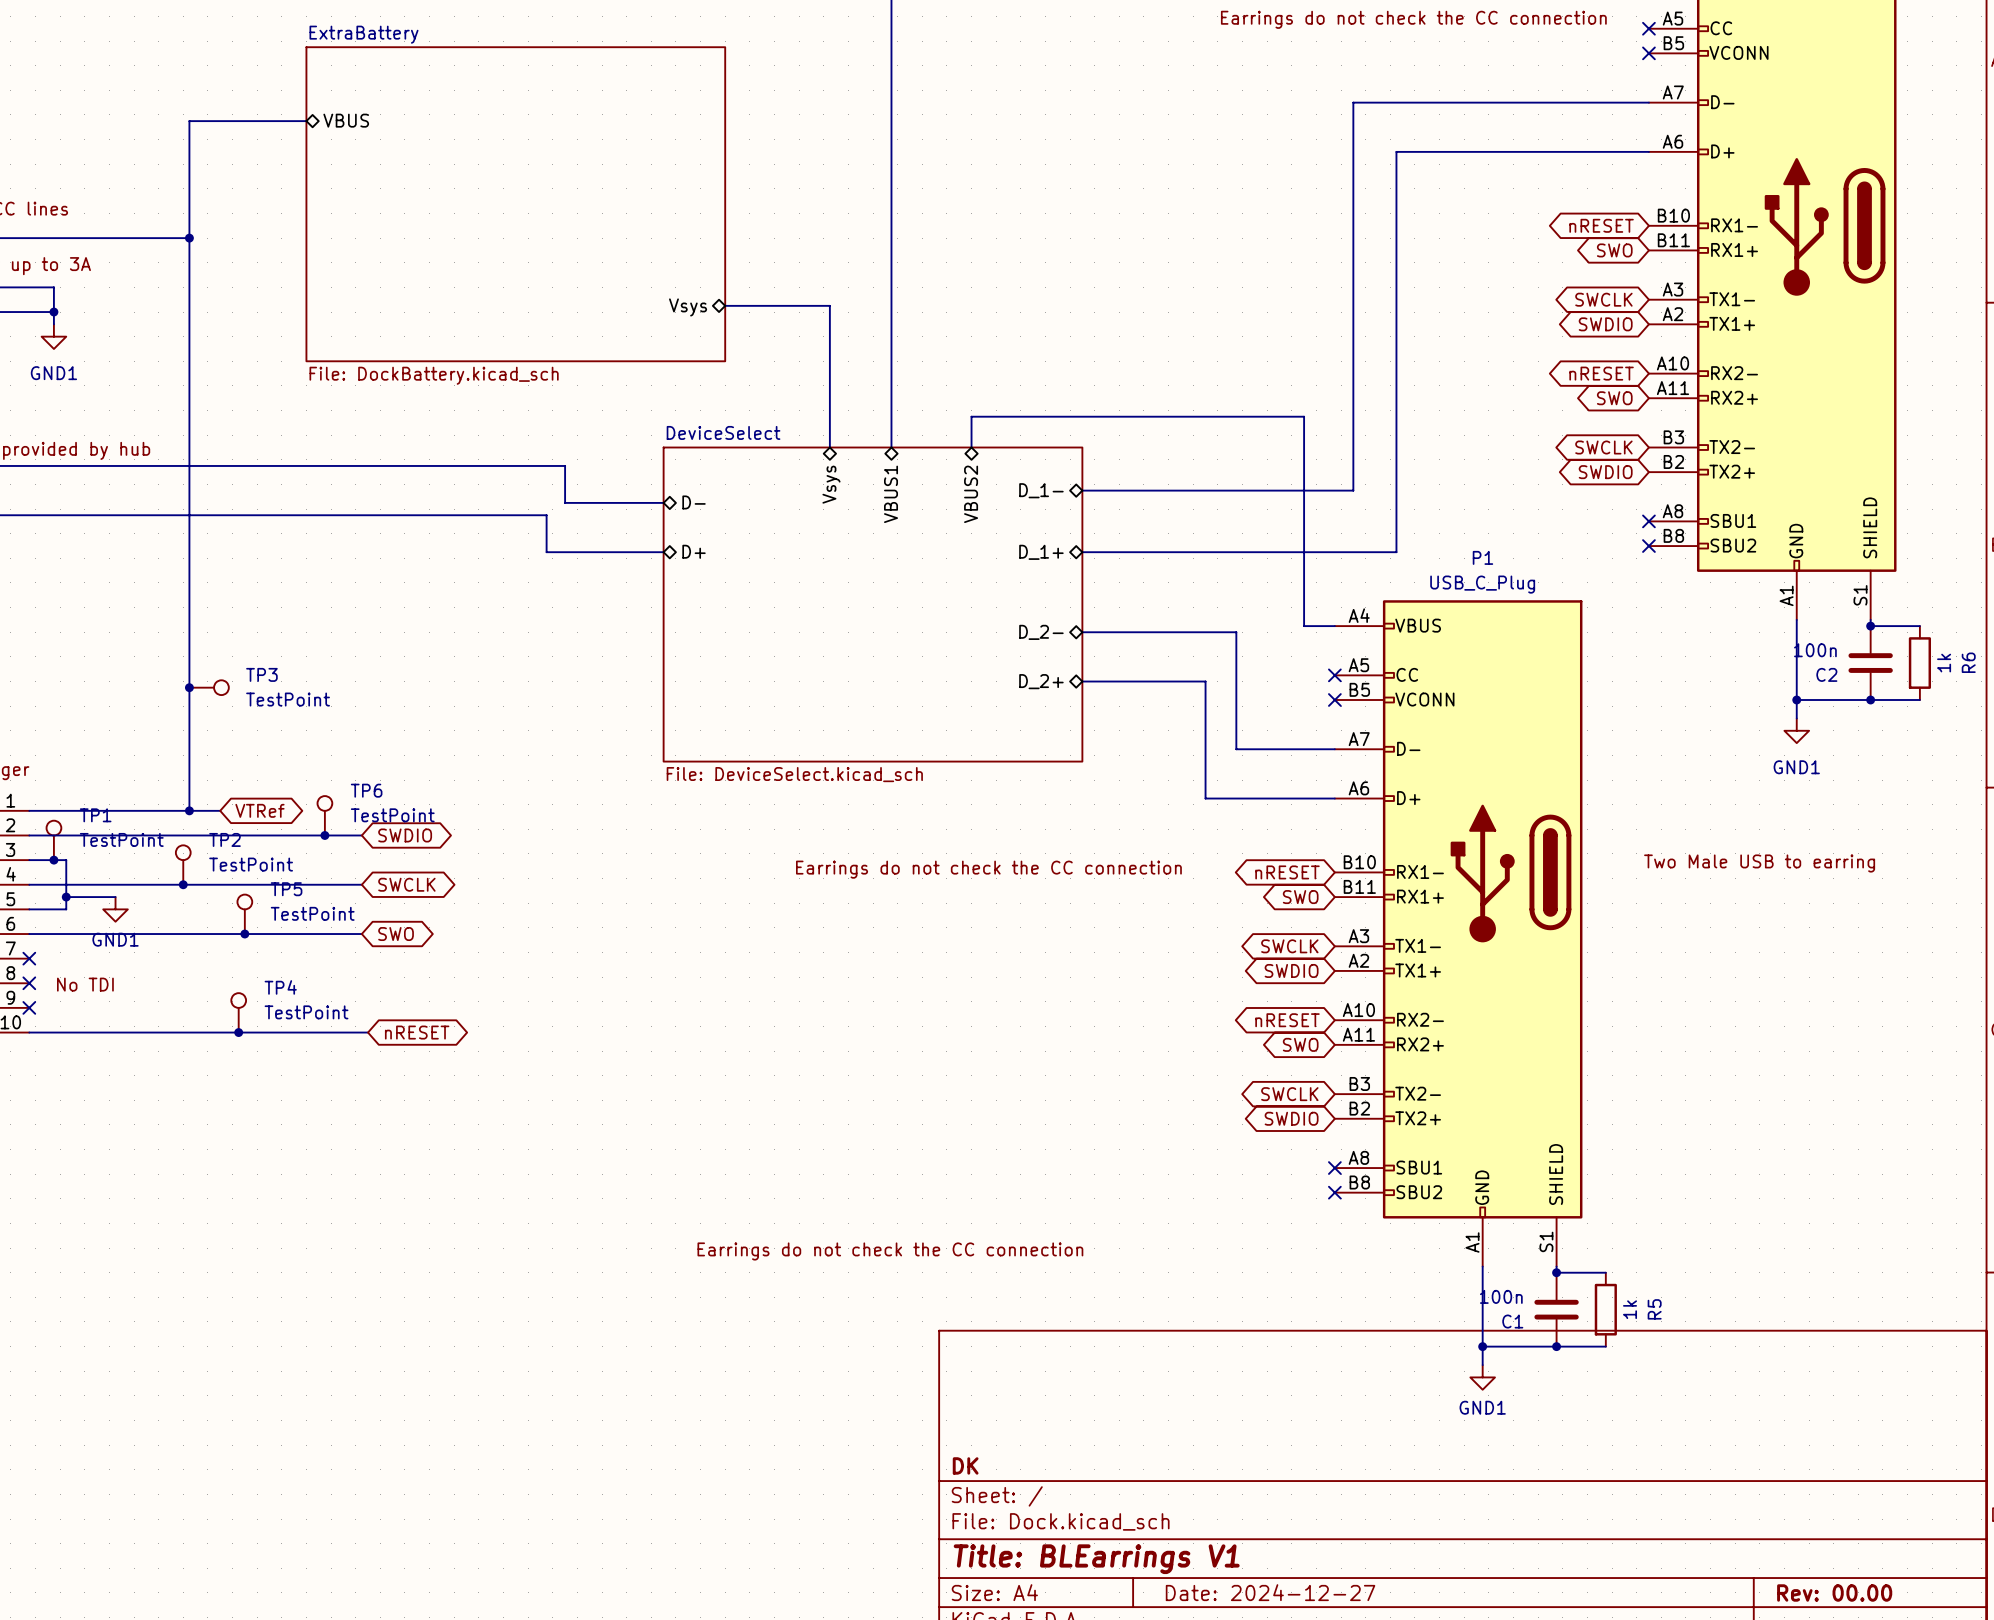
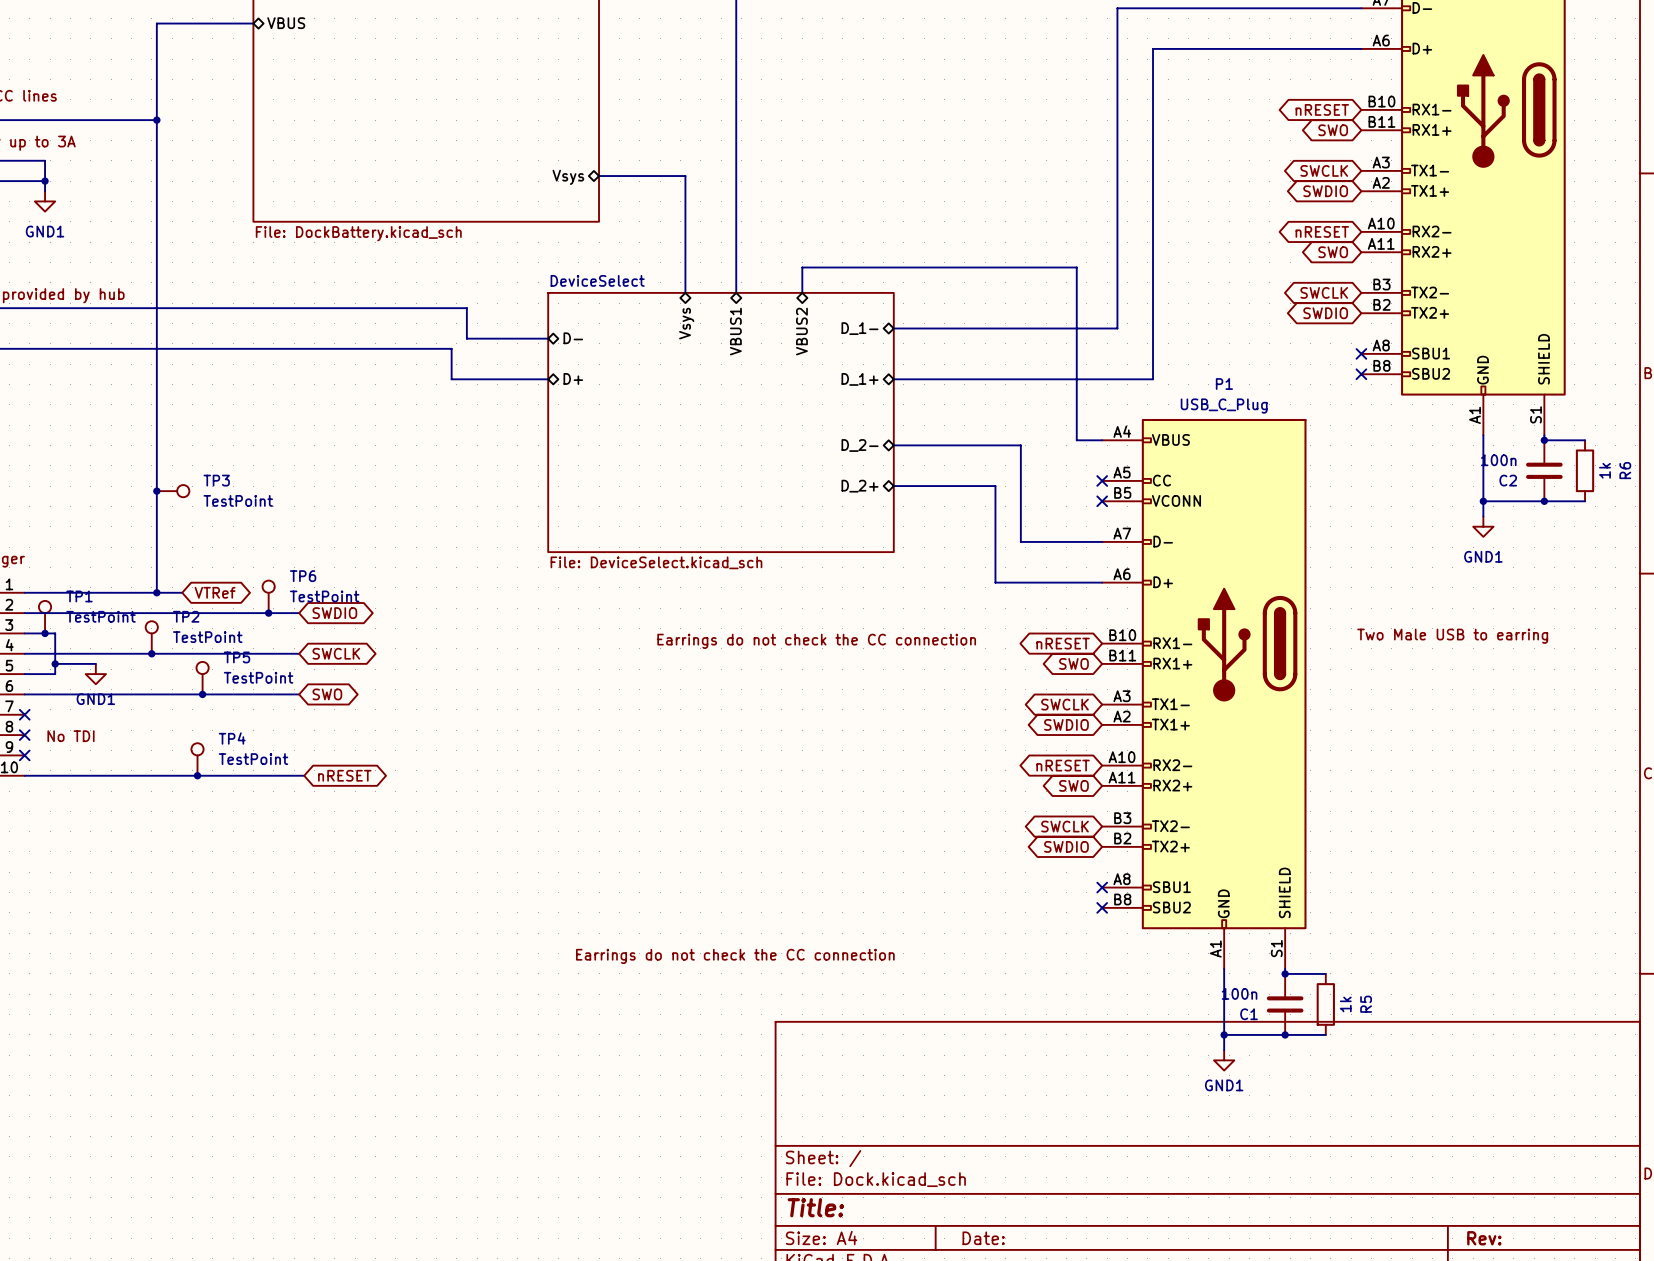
title block: DK (965, 1465) -> none
title block: Title: BLEarrings V1 (1096, 1559) -> Title: (815, 1207)
title block: Date: 2024-12-27 (1270, 1592) -> Date: (983, 1238)
title block: Rev: 00.00 (1834, 1592) -> Rev: (1484, 1238)

